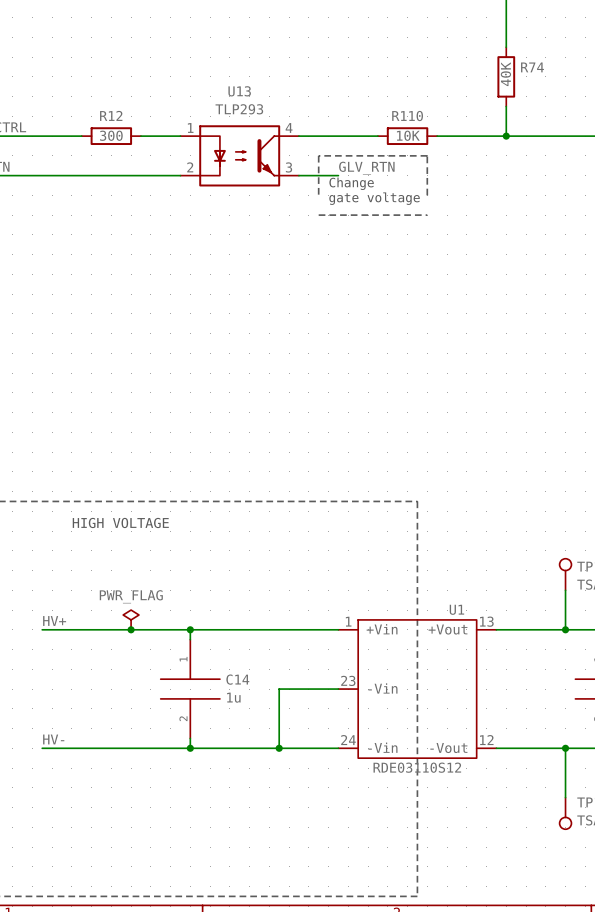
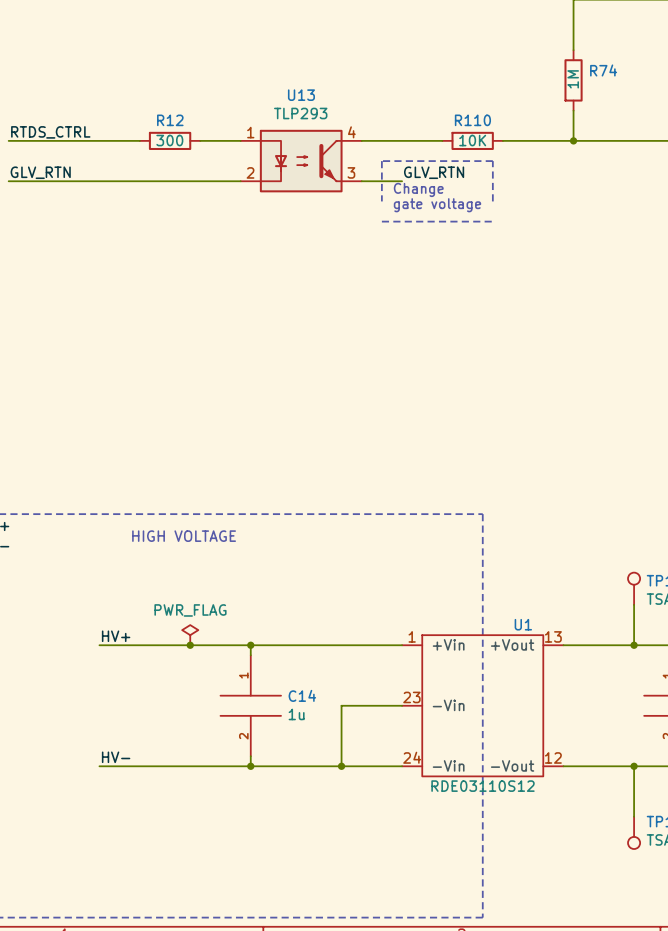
R74 value: 40K (505, 74) -> 1M (573, 79)

